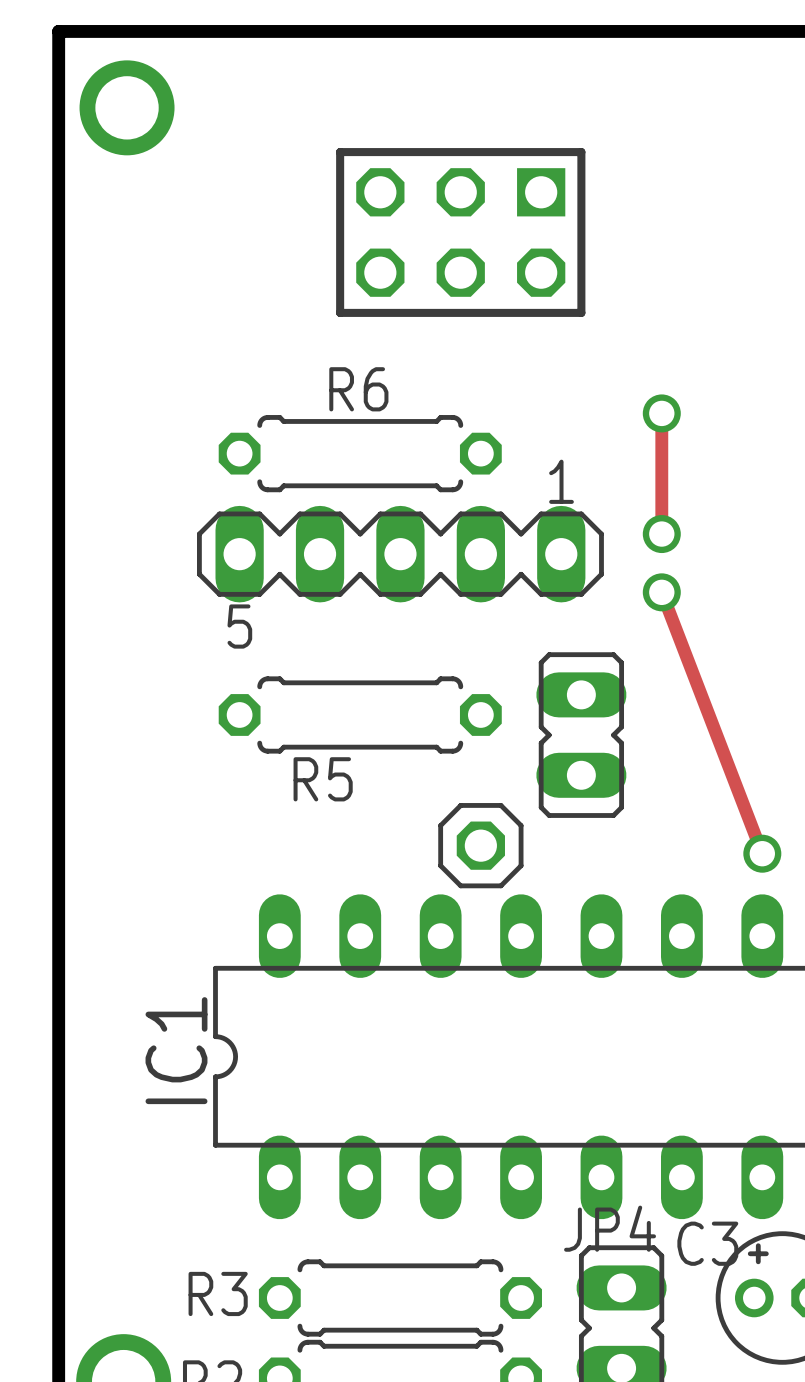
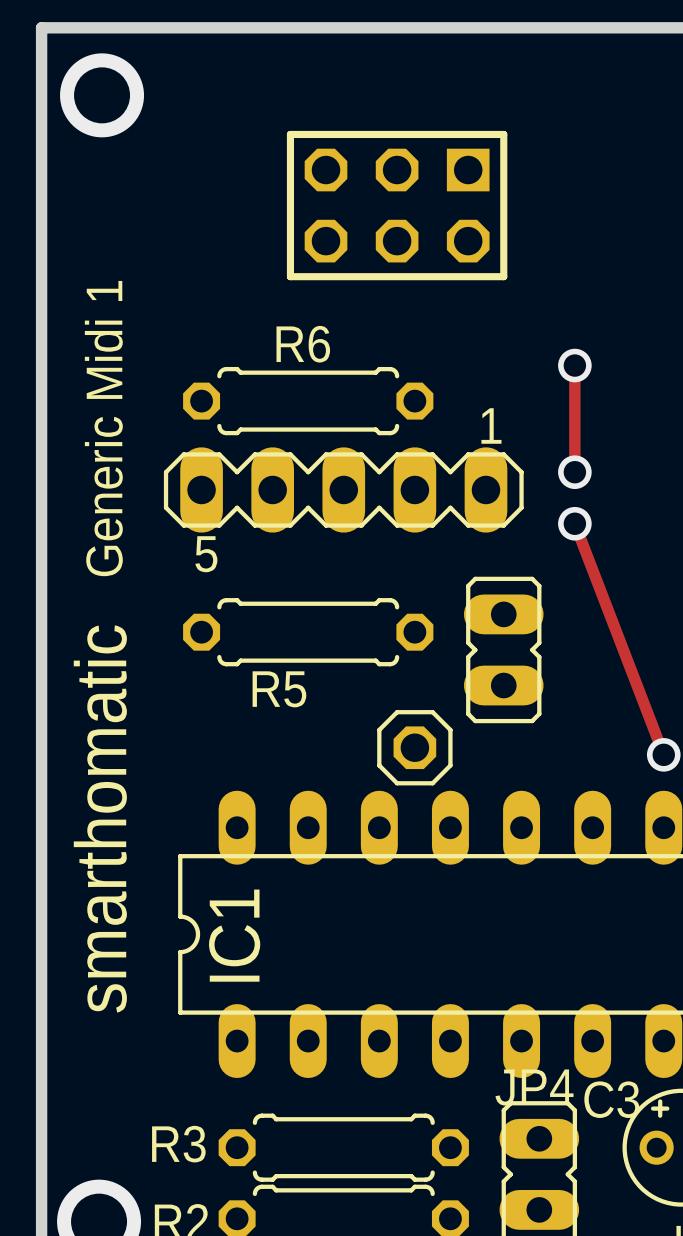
text: none -> Generic Midi 1 (103, 428)
text: none -> smarthomatic (100, 819)
IC1 name position: IC1 (176, 1050) -> IC1 (234, 935)

